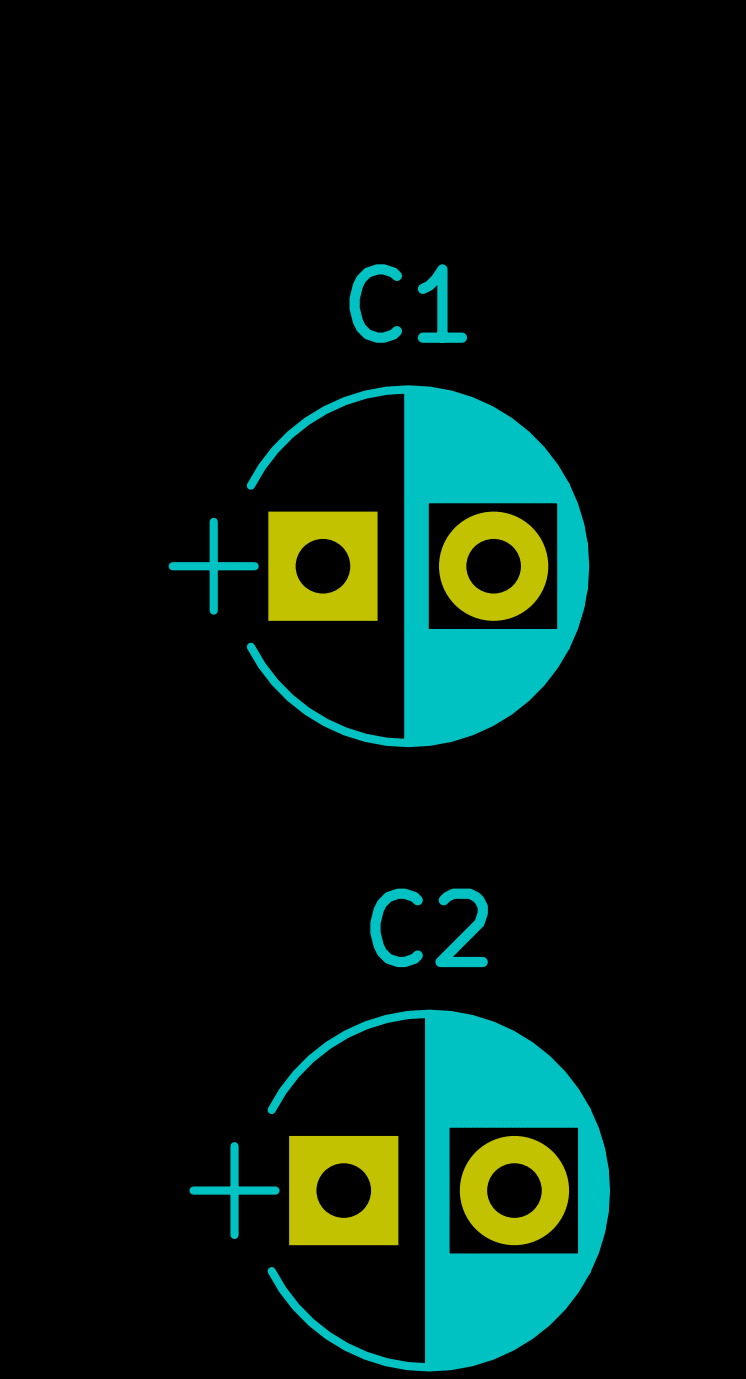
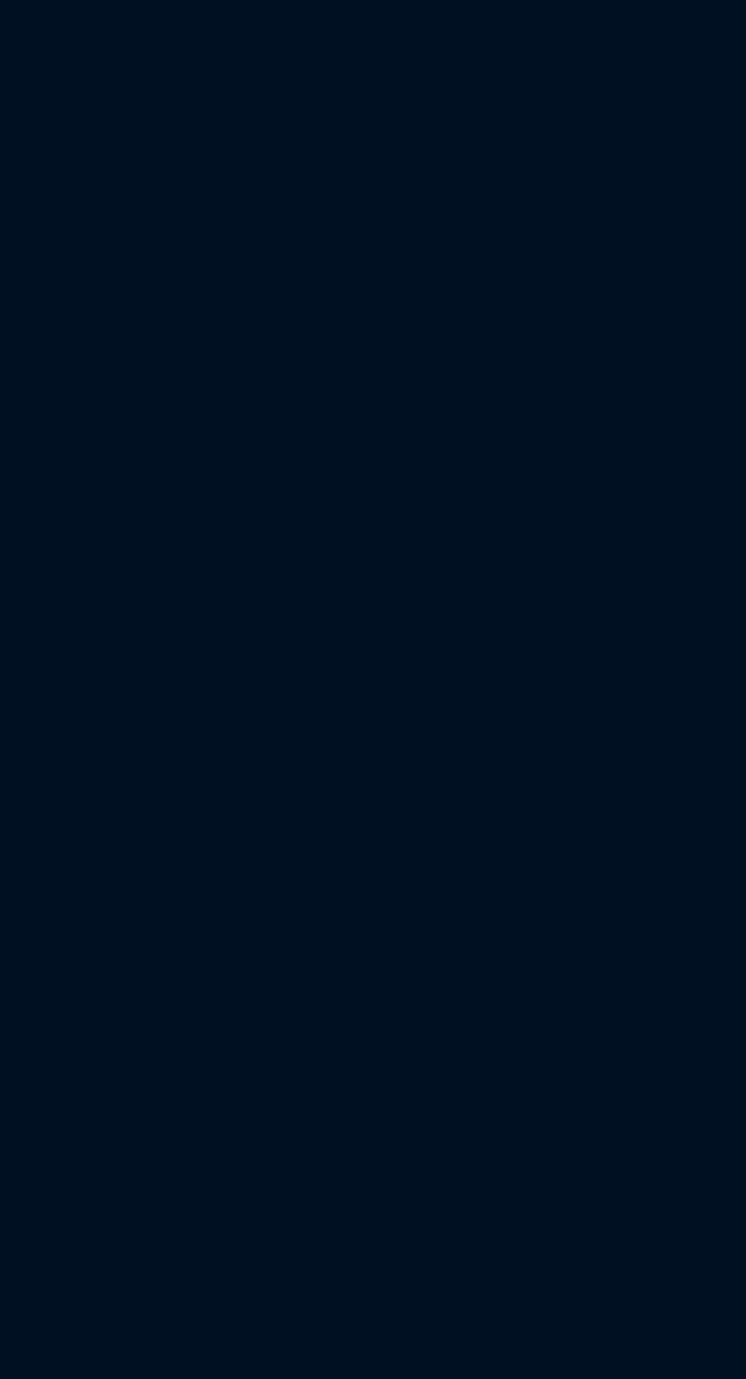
C1: (378, 566) -> none
C2: (399, 1190) -> none

